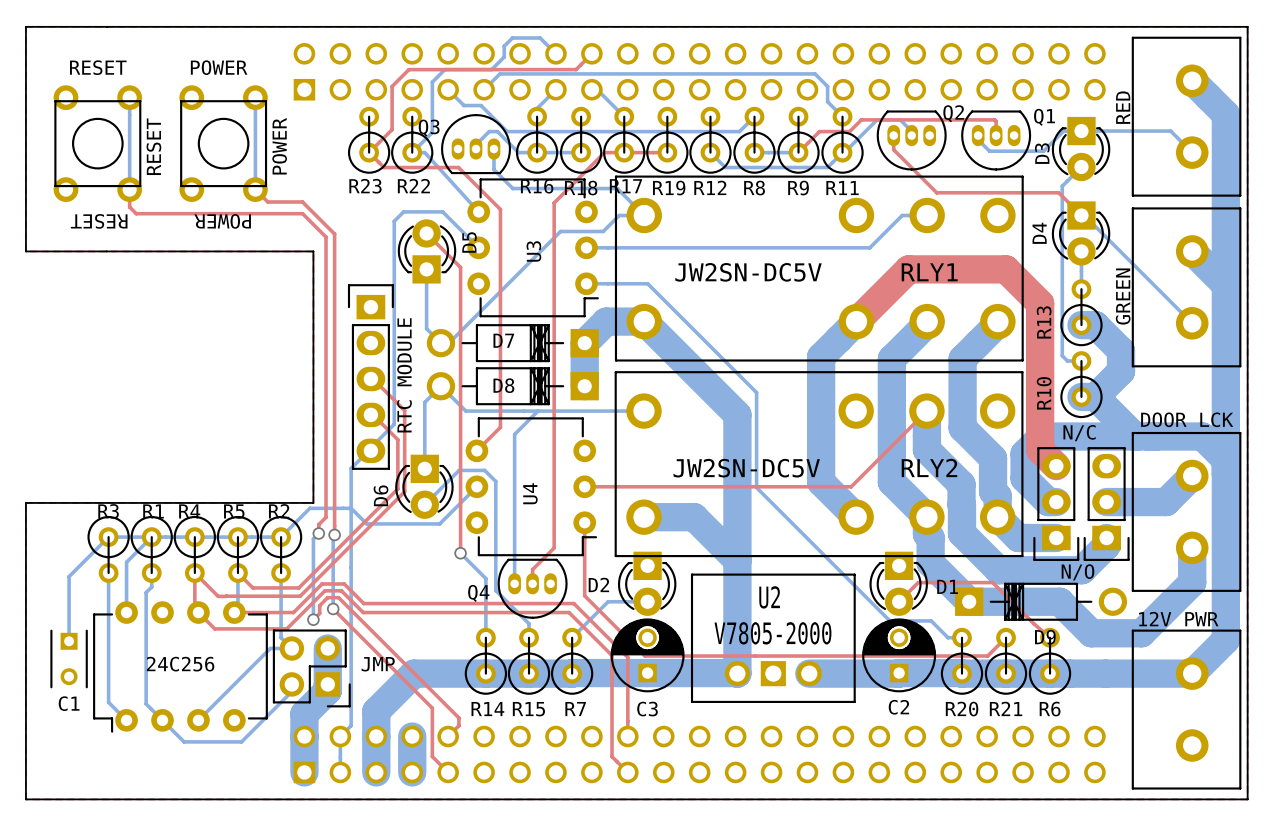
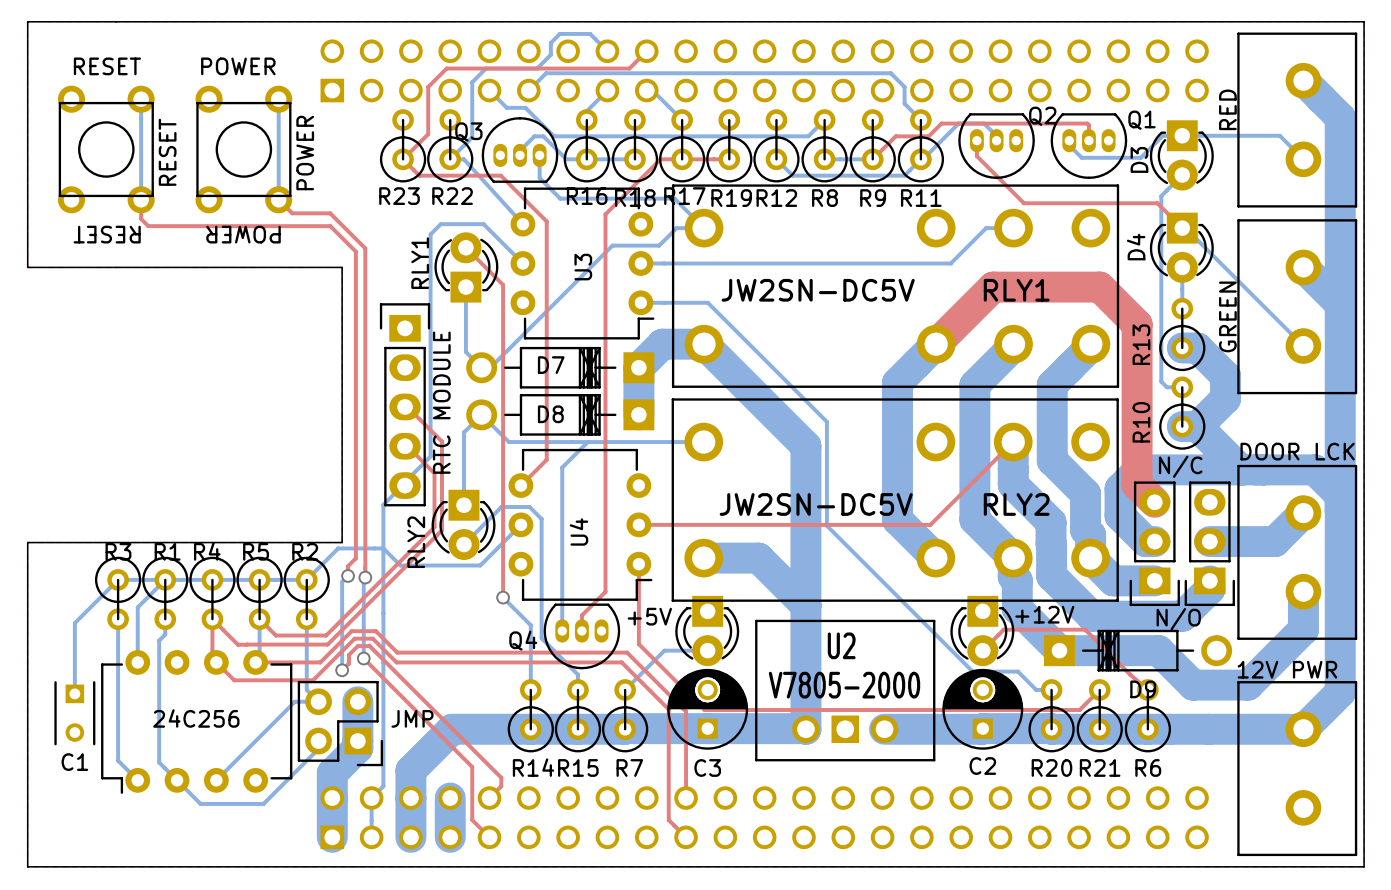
D5 name: D5 (469, 242) -> RLY1 (420, 263)
D6 name: D6 (381, 495) -> RLY2 (416, 542)
D2 name: D2 (598, 584) -> +5V (649, 616)
D1 name: D1 (947, 586) -> +12V (1044, 614)

